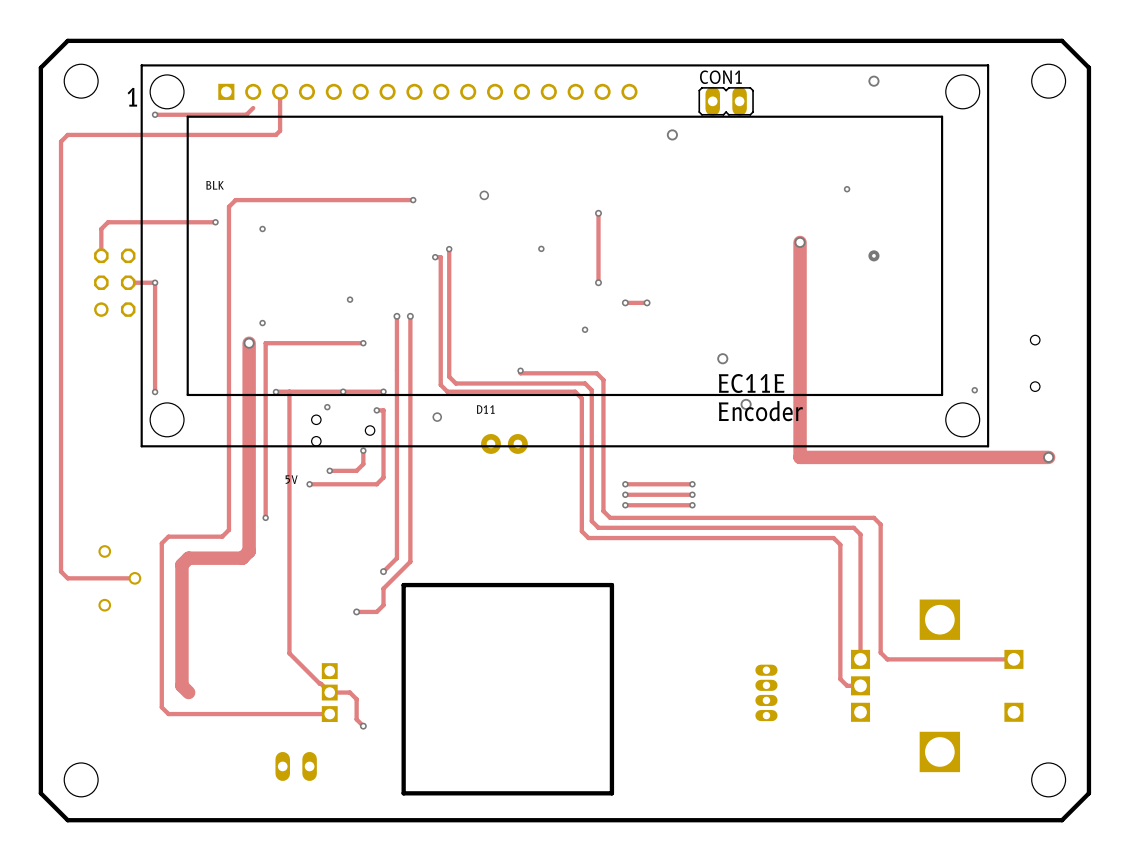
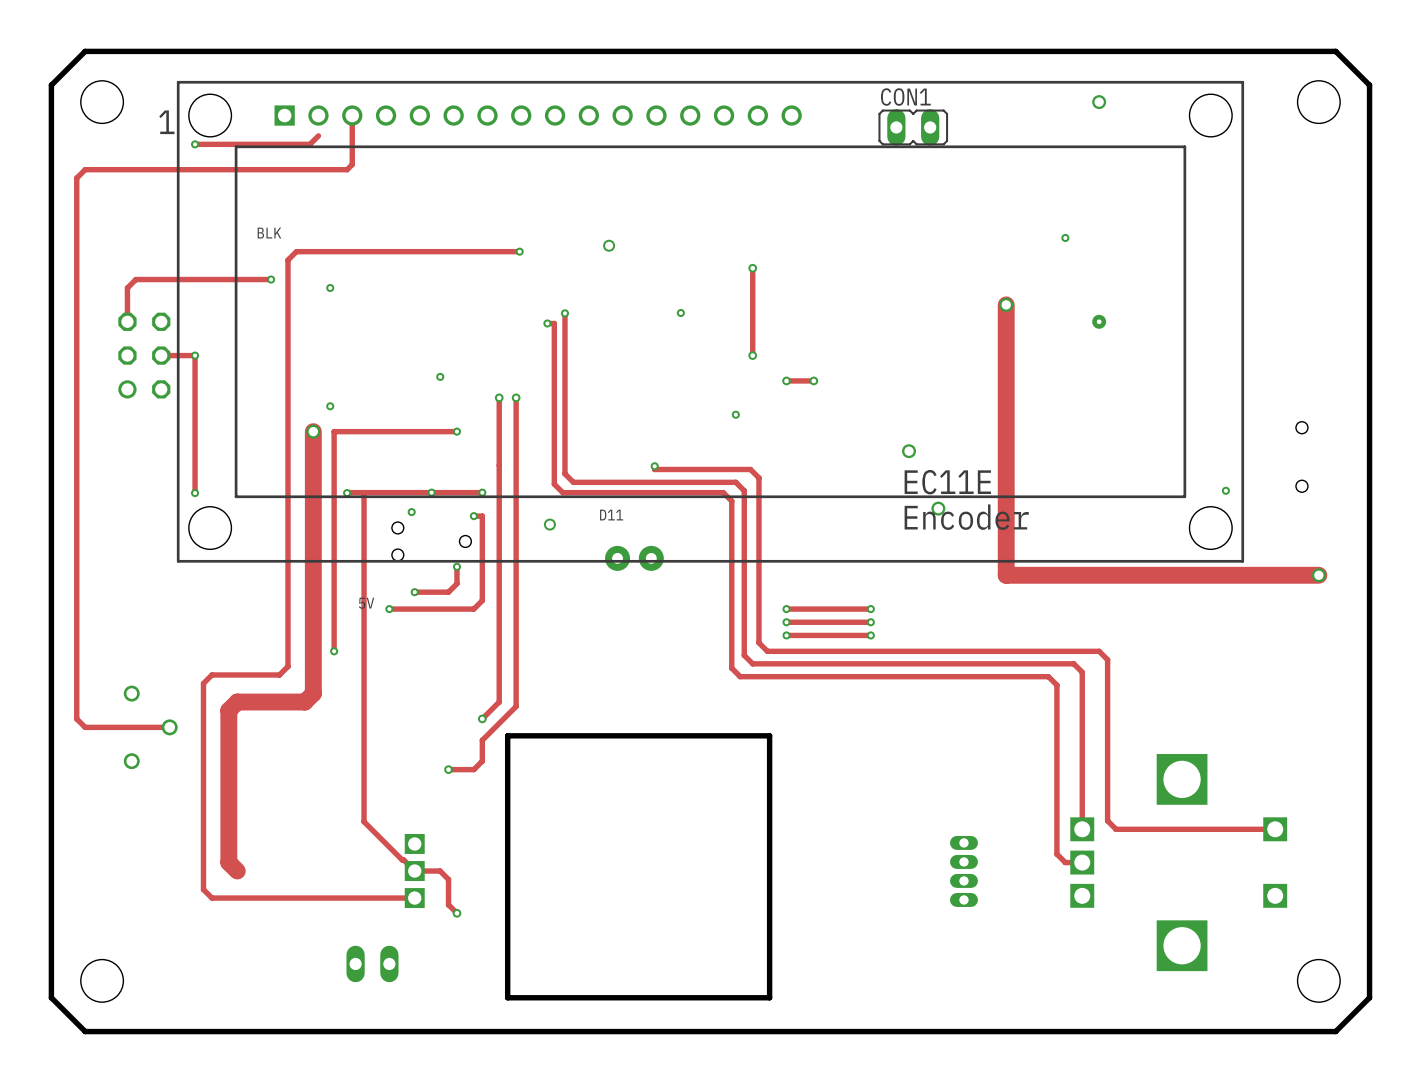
via: (672, 134) -> none

